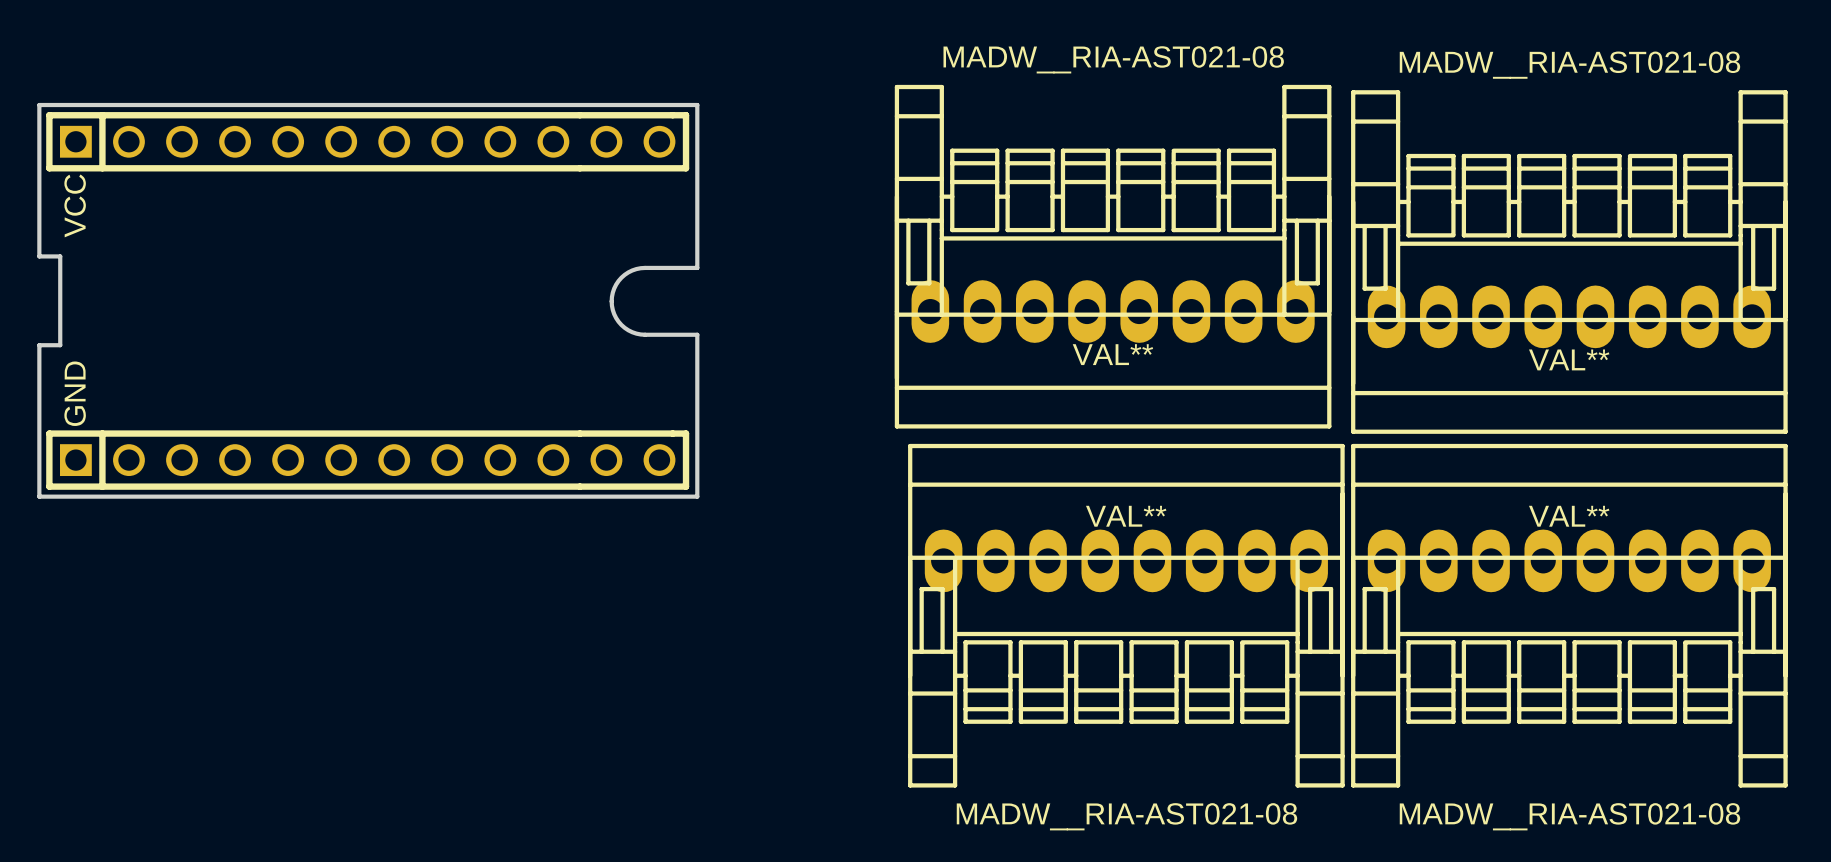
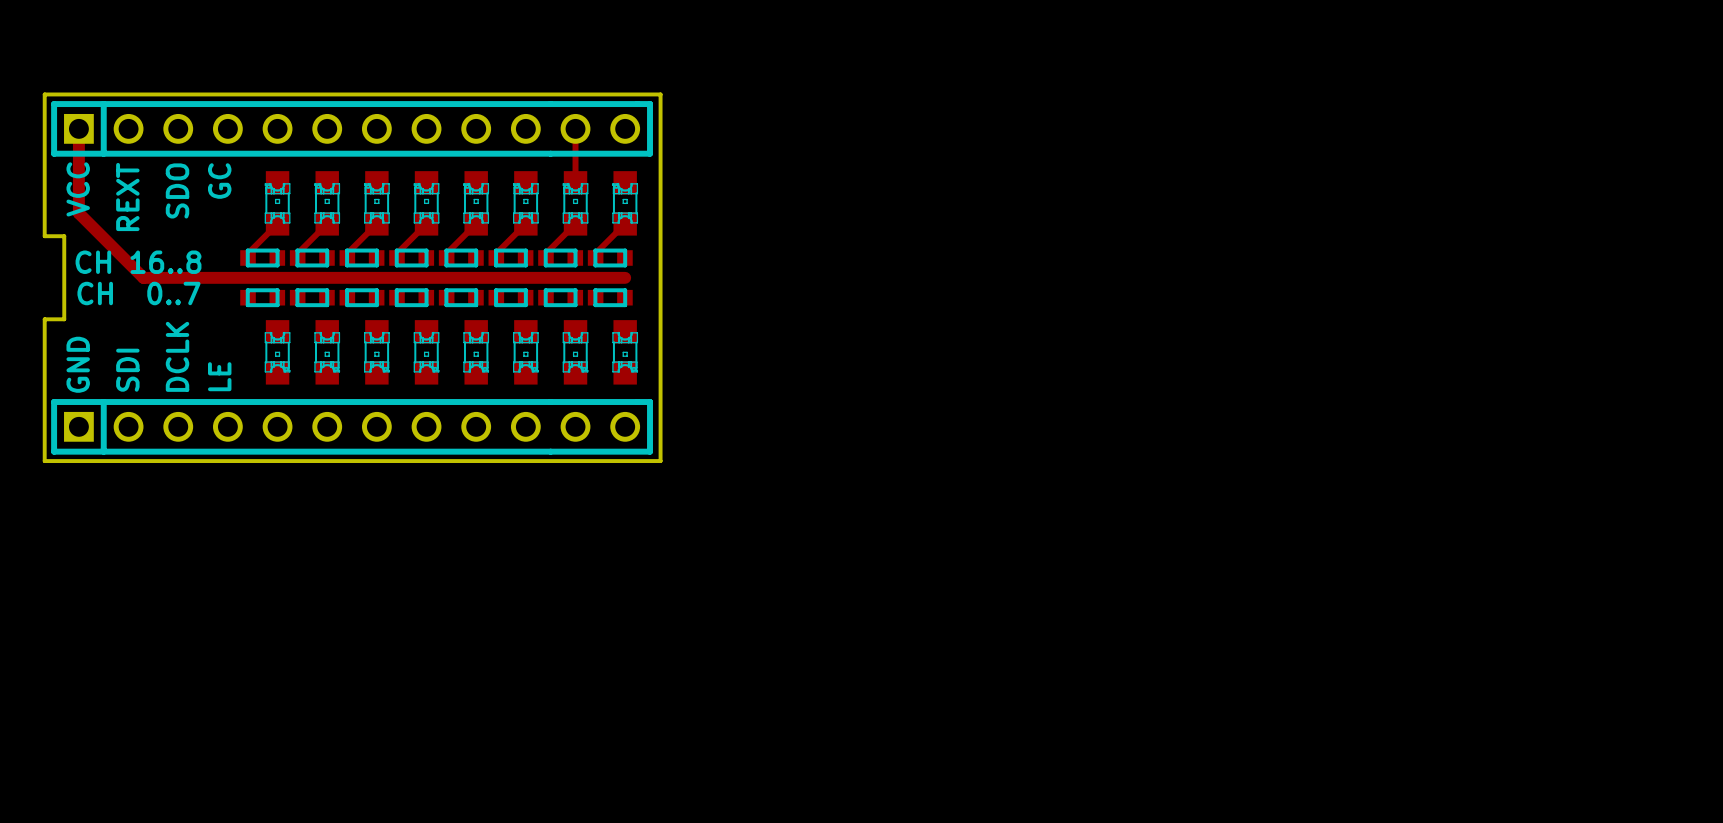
top track: none -> (78, 128) (78, 213) (143, 277) (625, 277)
top track: none -> (575, 134) (575, 182)
text: none -> GC (219, 181)
text: none -> SDO (177, 190)
text: none -> REXT (127, 197)
part: none -> (277, 203)
part: none -> (327, 203)
part: none -> (376, 203)
part: none -> (426, 203)
part: none -> (476, 203)
part: none -> (525, 203)
part: none -> (575, 203)
part: none -> (625, 203)
top track: none -> (277, 223) (248, 253) (248, 257)
top track: none -> (327, 223) (297, 253) (297, 257)
top track: none -> (376, 223) (347, 253) (347, 257)
top track: none -> (426, 223) (396, 253) (396, 257)
top track: none -> (476, 223) (446, 253) (446, 257)
top track: none -> (525, 223) (496, 253) (496, 257)
top track: none -> (575, 223) (545, 253) (545, 257)
top track: none -> (625, 223) (595, 253) (595, 257)
MADW__RIA-AST021-08: VAL** (1113, 256) -> none
MADW__RIA-AST021-08: VAL** (1569, 262) -> none
board edge: (697, 267) (645, 267) (632, 270) (618, 281) (614, 288) (611, 301) (616, 318) (621, 324) (632, 332) (645, 334) (697, 334) -> (660, 246) (660, 309)
part: none -> (262, 257)
part: none -> (312, 257)
part: none -> (361, 257)
part: none -> (411, 257)
part: none -> (461, 257)
part: none -> (510, 257)
part: none -> (560, 257)
part: none -> (610, 257)
text: none -> CH 16..8 (138, 262)
text: none -> CH 0..7 (138, 293)
part: none -> (262, 297)
part: none -> (312, 297)
part: none -> (361, 297)
part: none -> (411, 297)
part: none -> (461, 297)
part: none -> (510, 297)
part: none -> (560, 297)
part: none -> (610, 297)
part: none -> (277, 352)
part: none -> (327, 352)
part: none -> (376, 352)
part: none -> (426, 352)
part: none -> (476, 352)
part: none -> (525, 352)
part: none -> (575, 352)
part: none -> (625, 352)
text: none -> DCLK (177, 356)
text: none -> SDI (127, 370)
text: none -> LE (219, 376)
MADW__RIA-AST021-08: VAL** (1126, 615) -> none
MADW__RIA-AST021-08: VAL** (1569, 615) -> none

